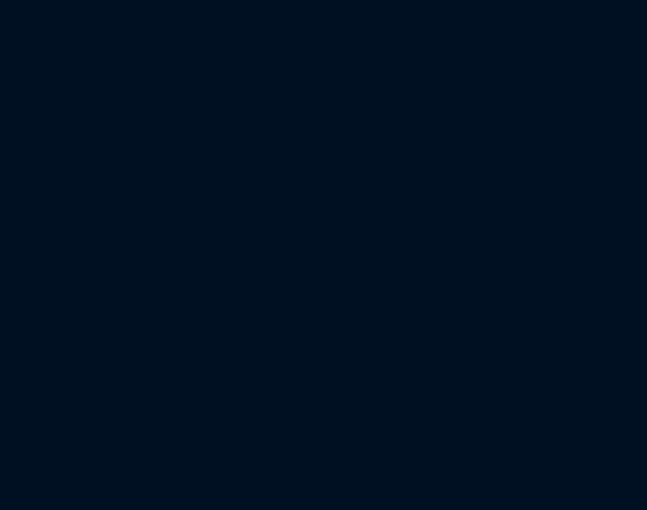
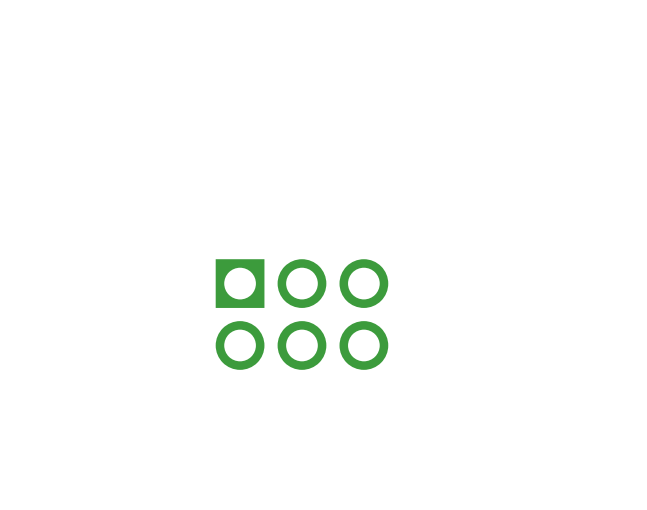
part: none -> (301, 314)

